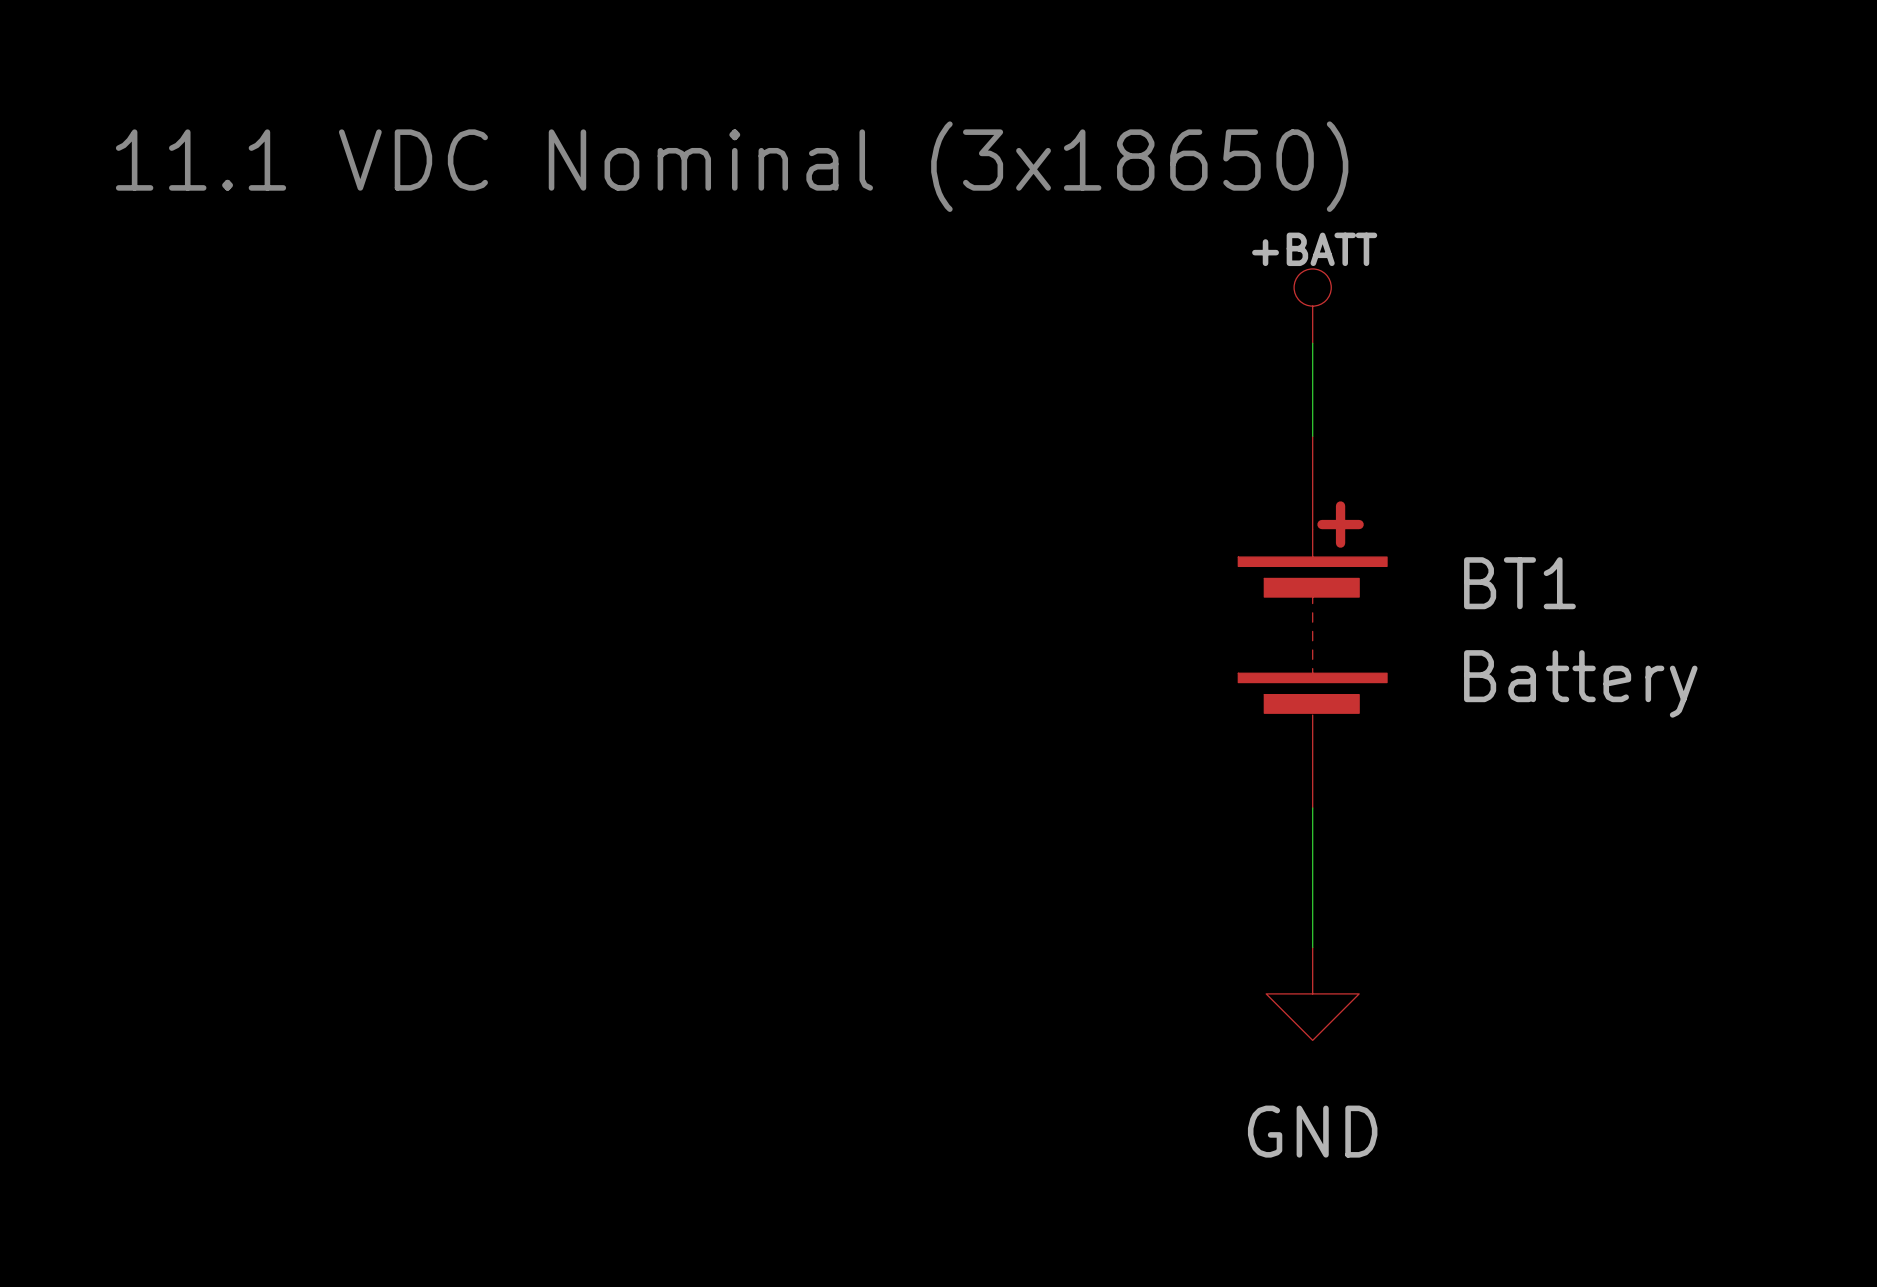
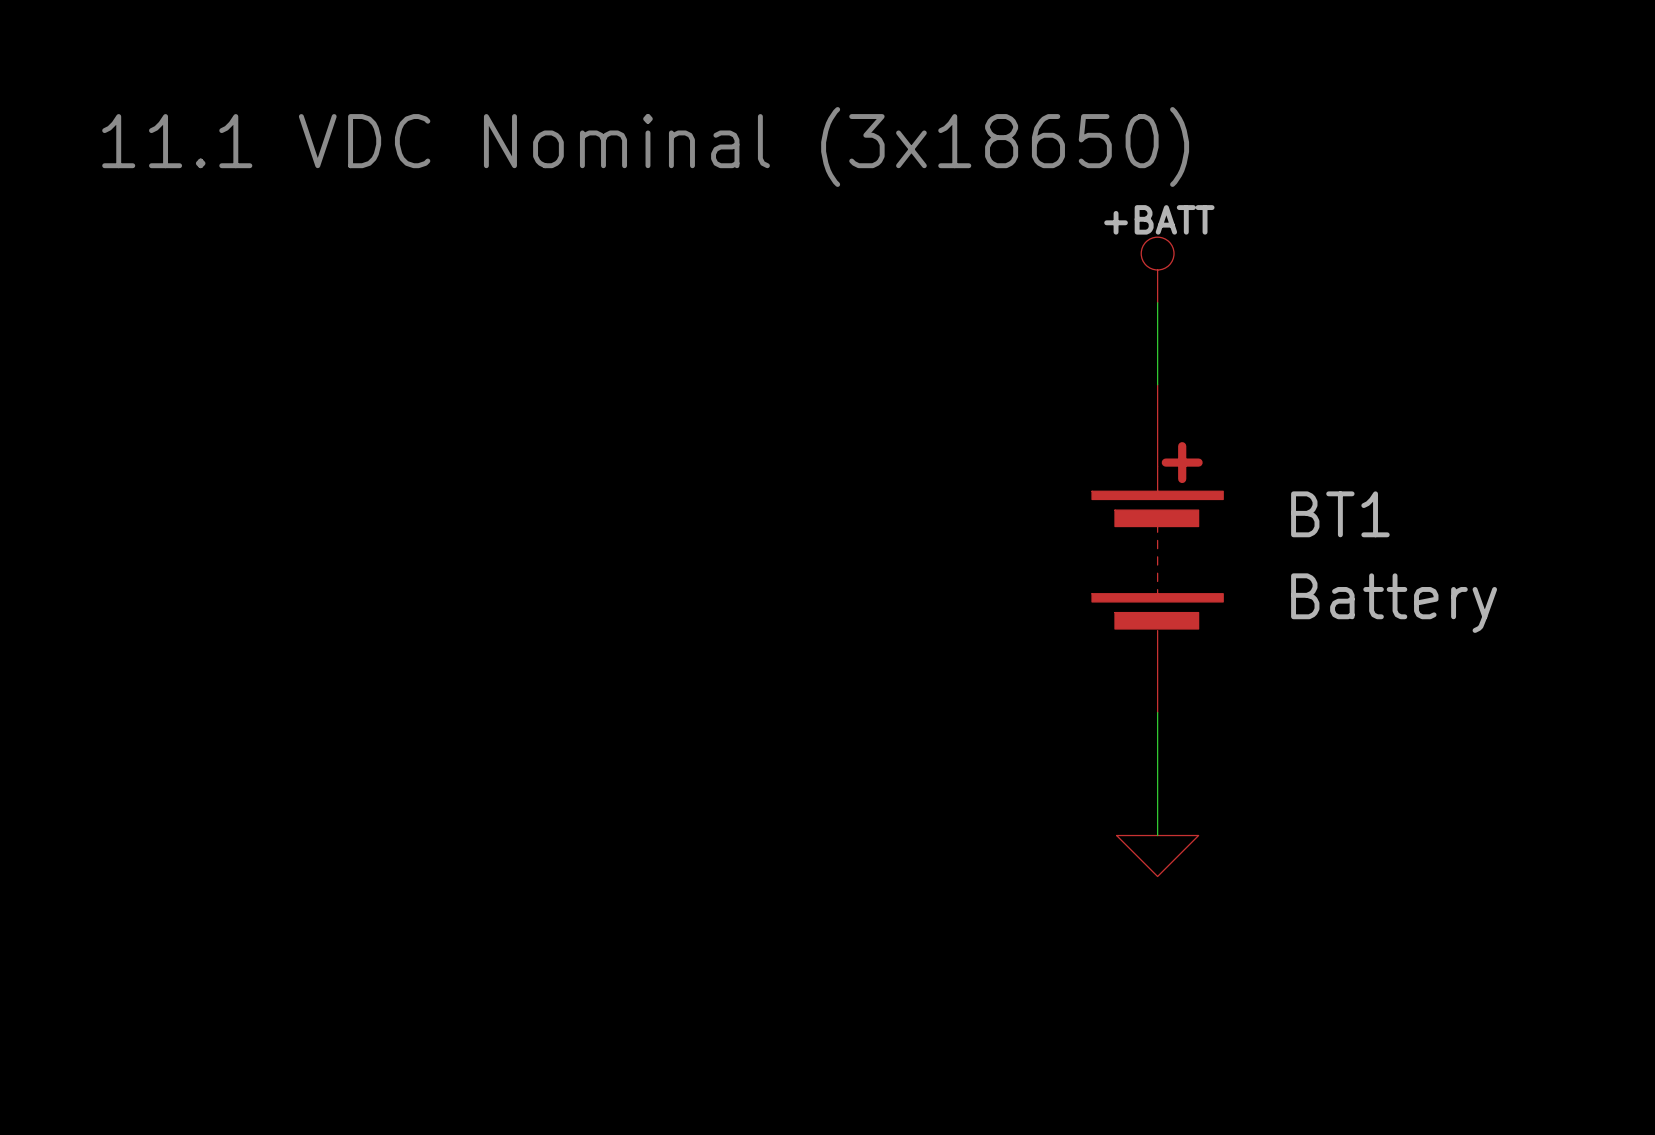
power symbol shape: [1266, 947, 1360, 1041] -> [1116, 835, 1199, 877]
power symbol text: GND (1312, 1131) -> none

